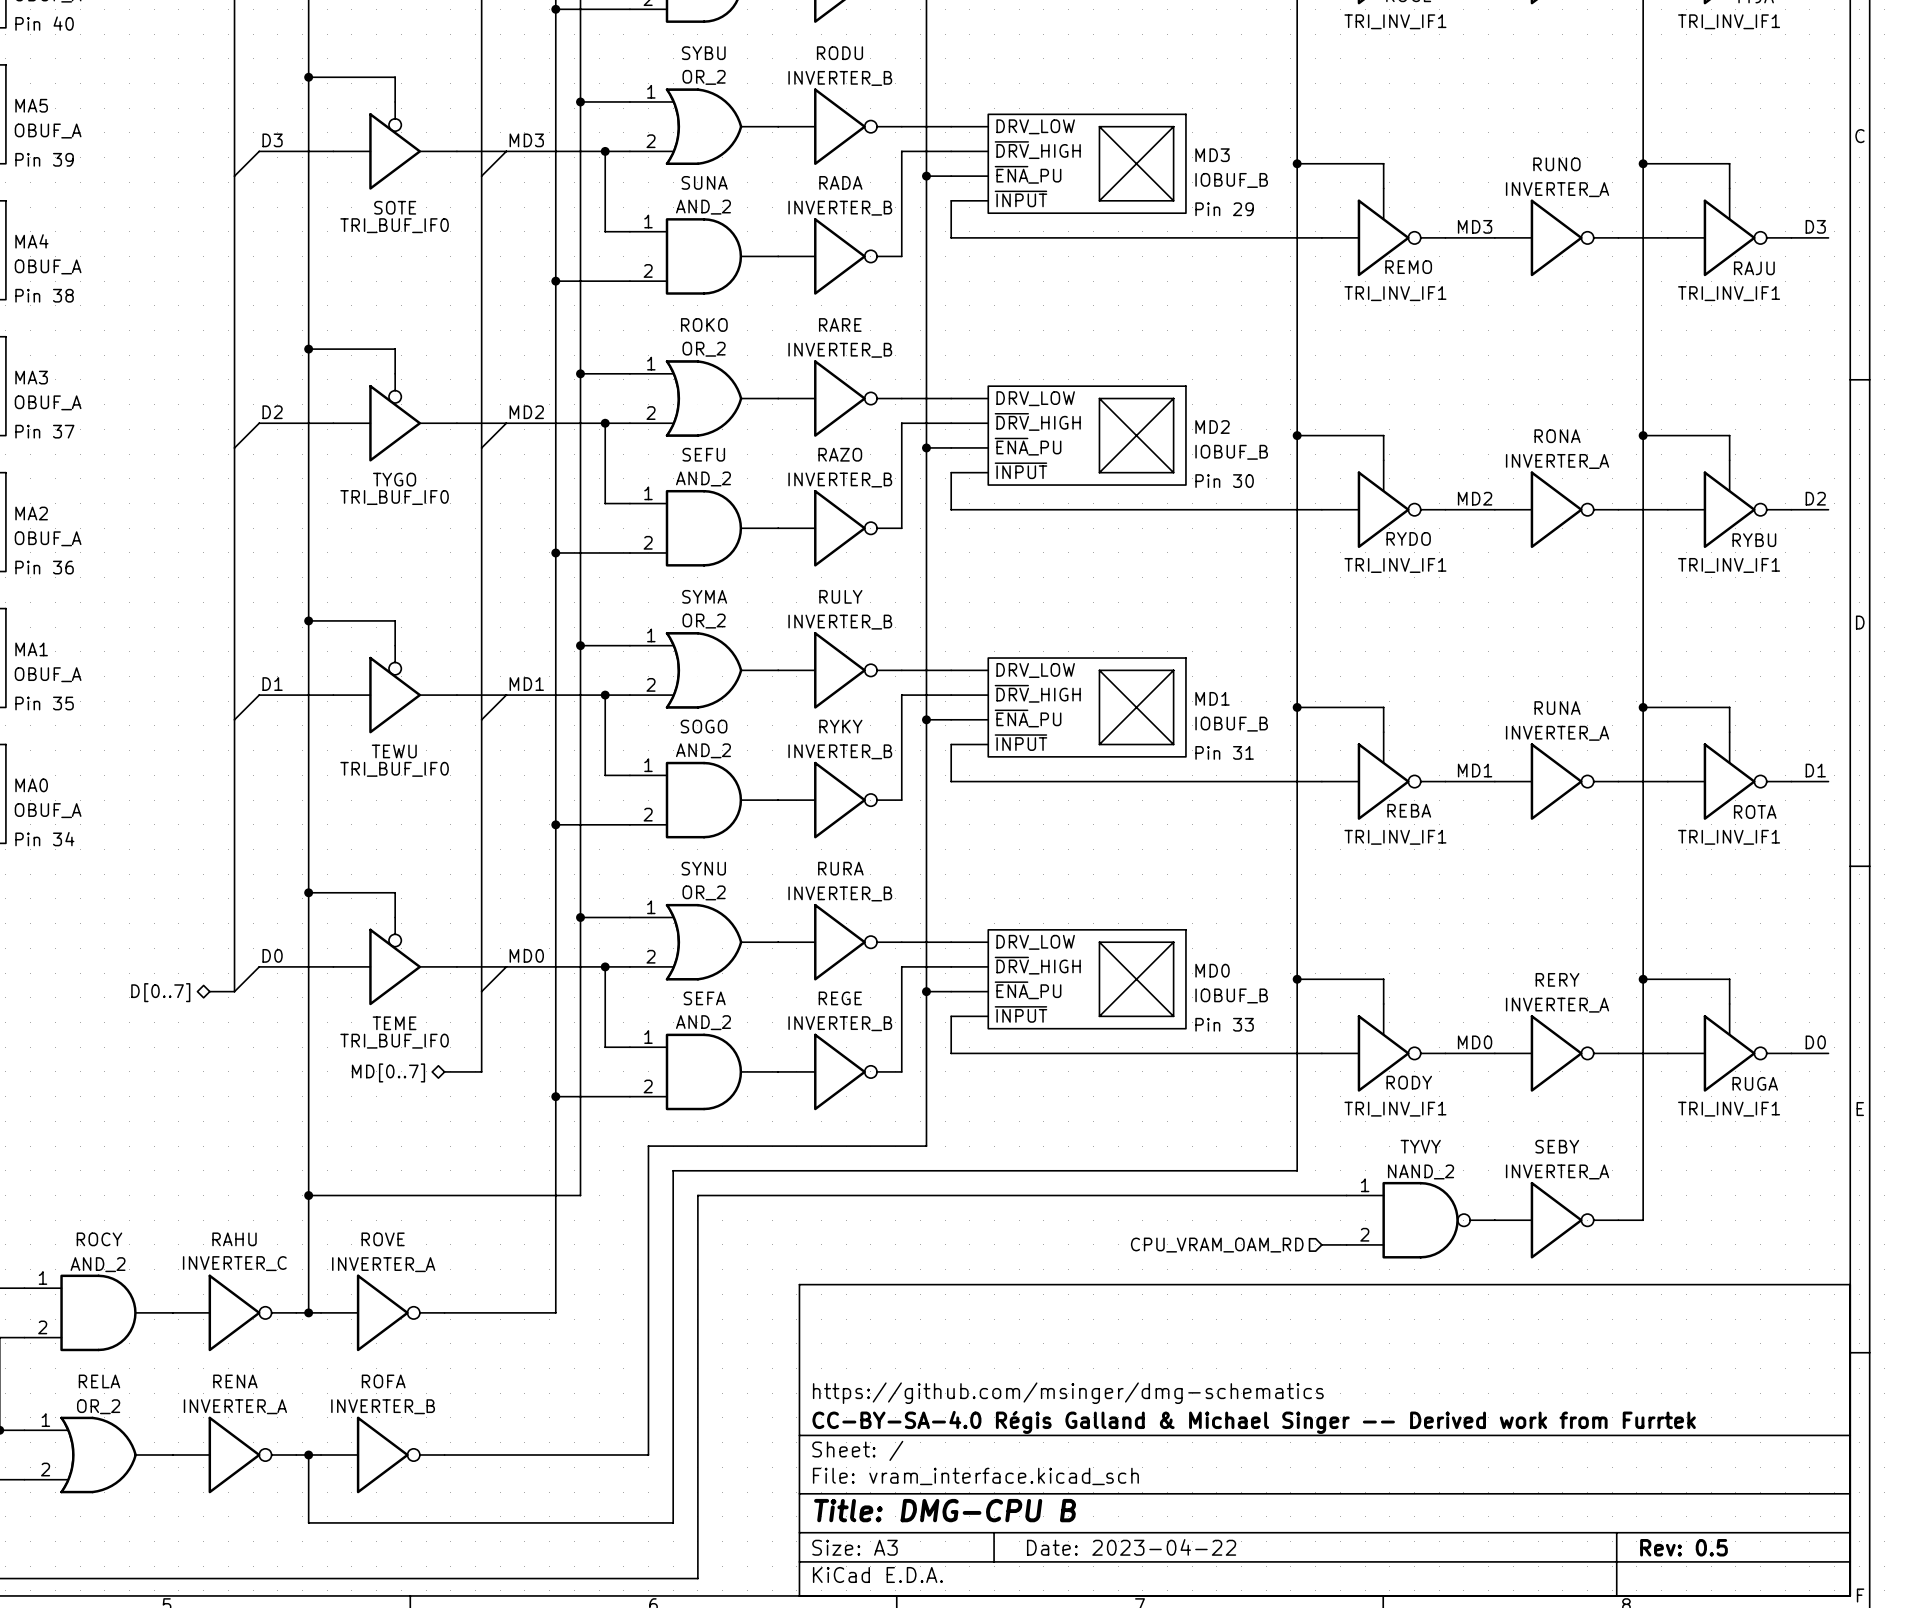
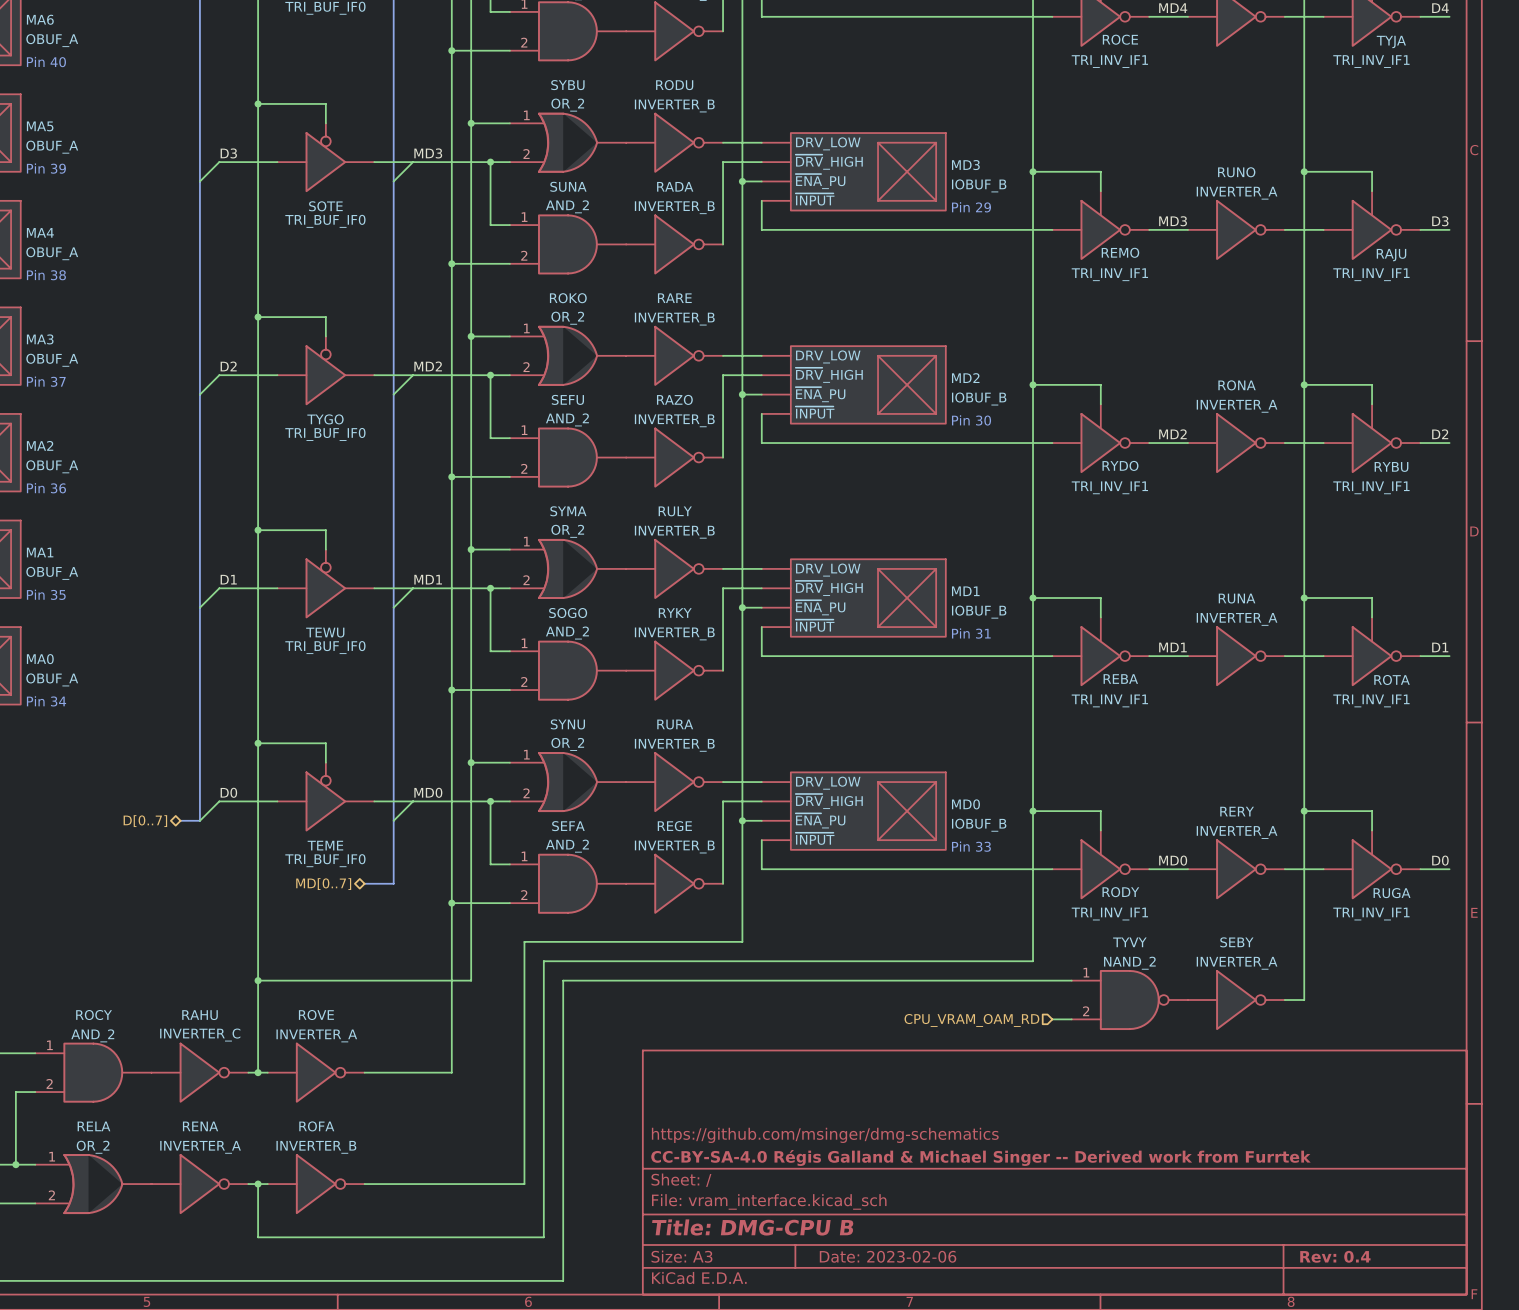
title block: Date: 2023-04-22 (1131, 1547) -> Date: 2023-02-06 (888, 1256)
title block: Rev: 0.5 (1683, 1547) -> Rev: 0.4 (1335, 1256)

